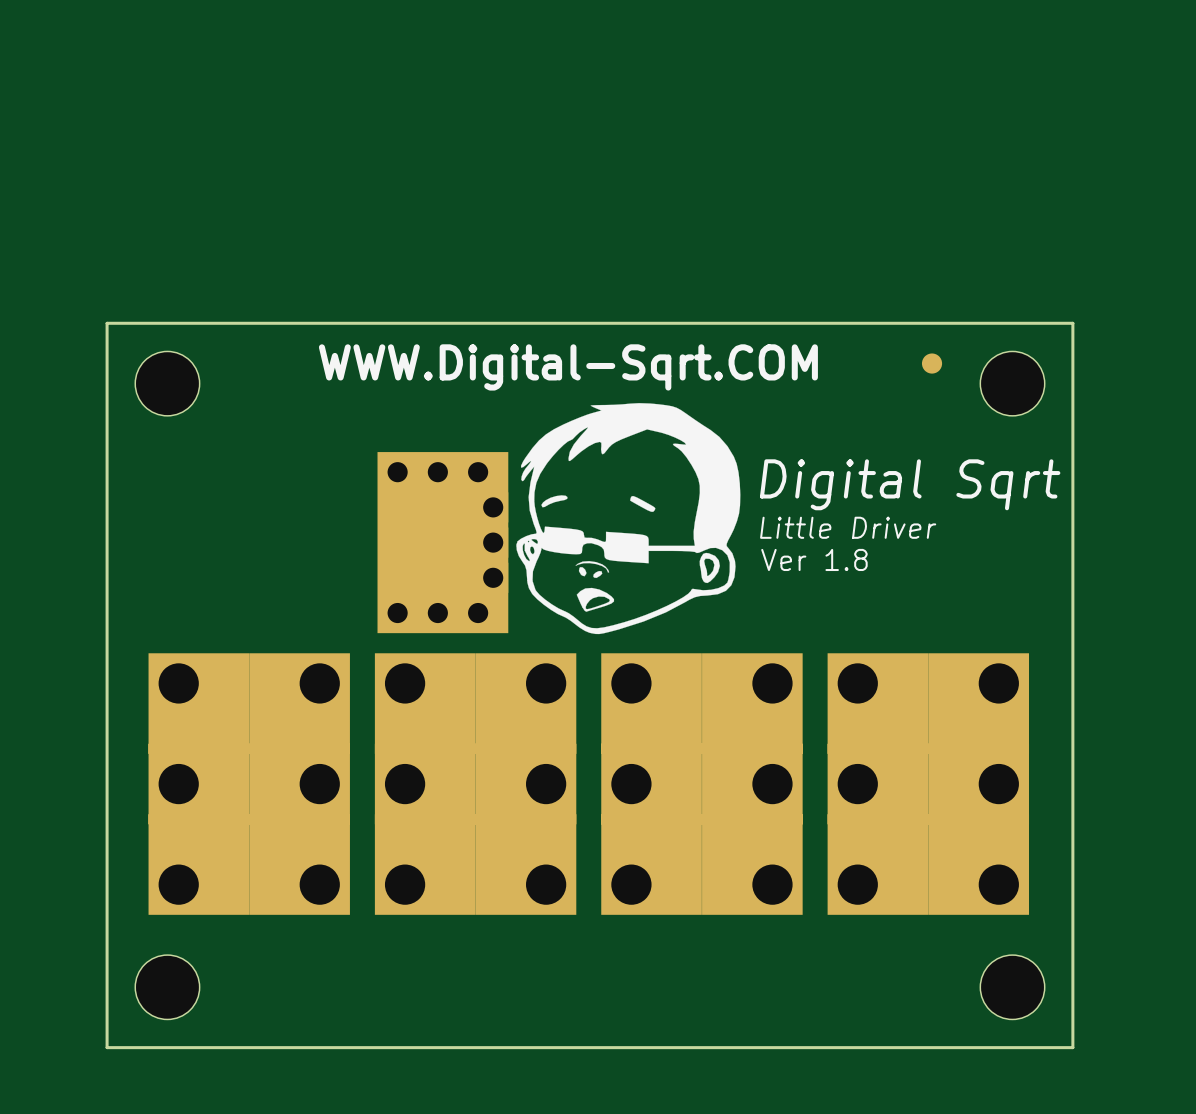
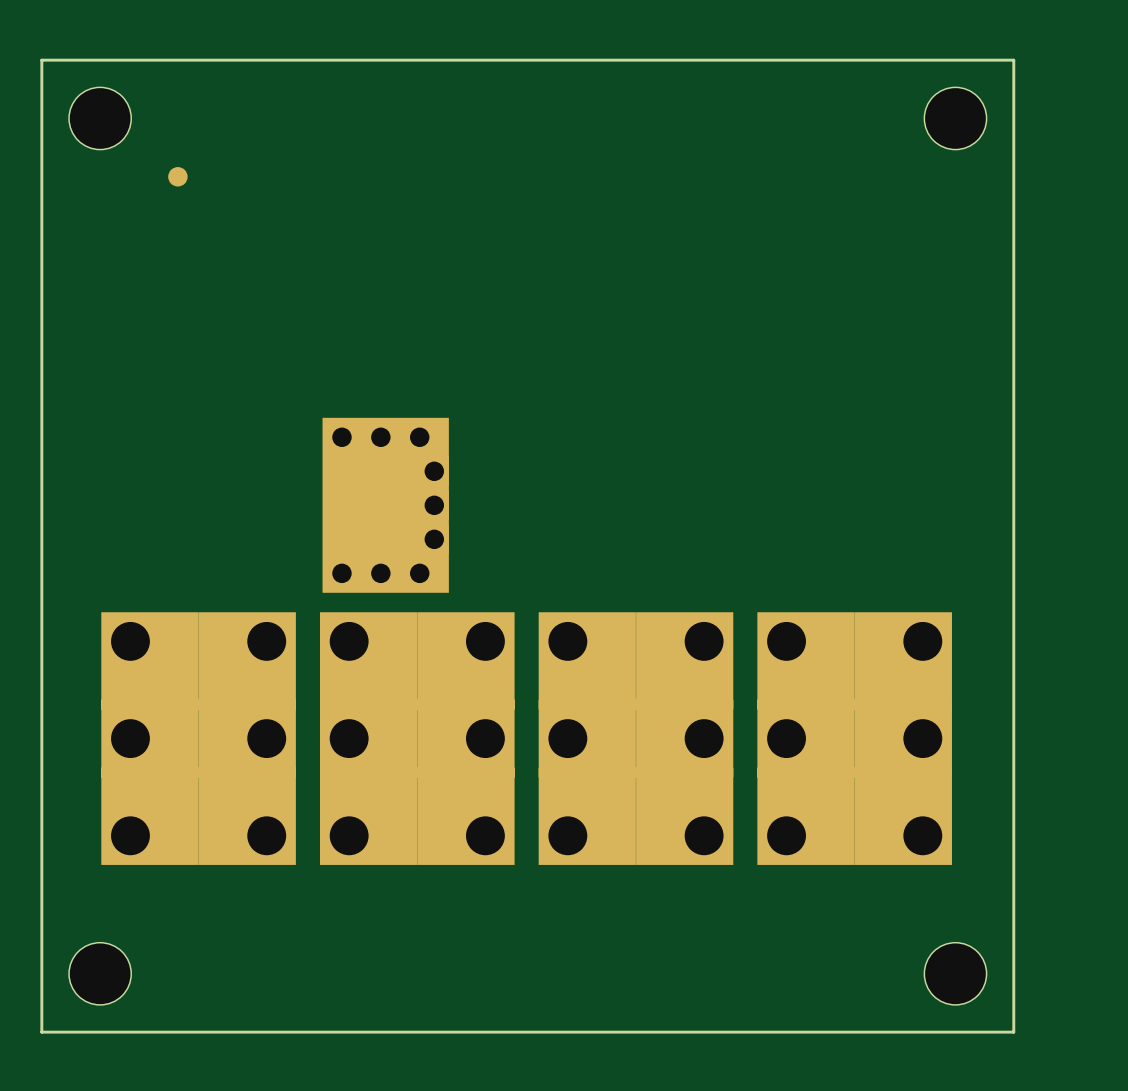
part: none -> (177, 176)
board edge: (1072, 323) (1072, 1047) (107, 1047) (107, 323) (1072, 323) -> (1013, 60) (1013, 1032) (41, 1032) (41, 60) (1013, 60)
part: (932, 363) -> none
text: WWW.Digital-Sqrt.COM (568, 367) -> none
part position: (167, 383) -> (100, 118)
part position: (1012, 383) -> (955, 118)
drawing: [516, 403, 741, 635] -> none
text: Digital Sqrt (910, 484) -> none
text: Little Driver (848, 527) -> none
text: Ver 1.8 (814, 559) -> none
part position: (167, 987) -> (100, 973)
part position: (1012, 987) -> (955, 973)

